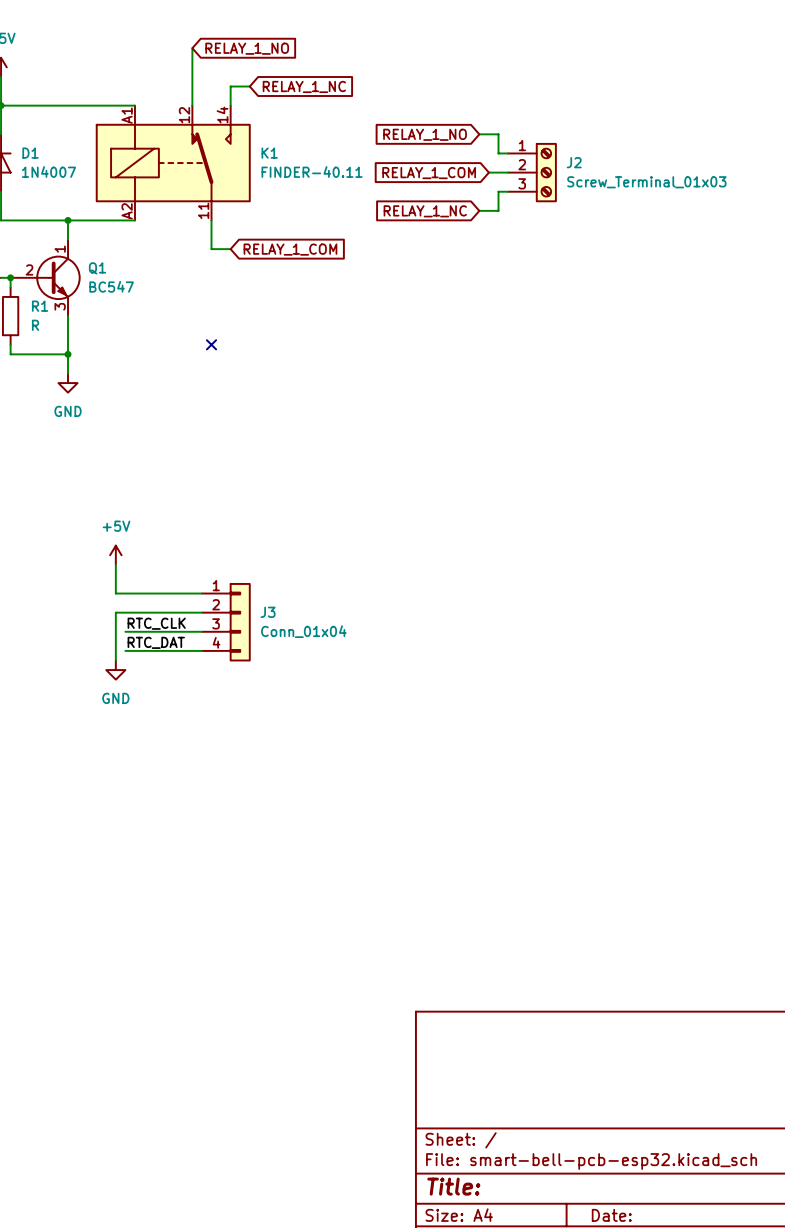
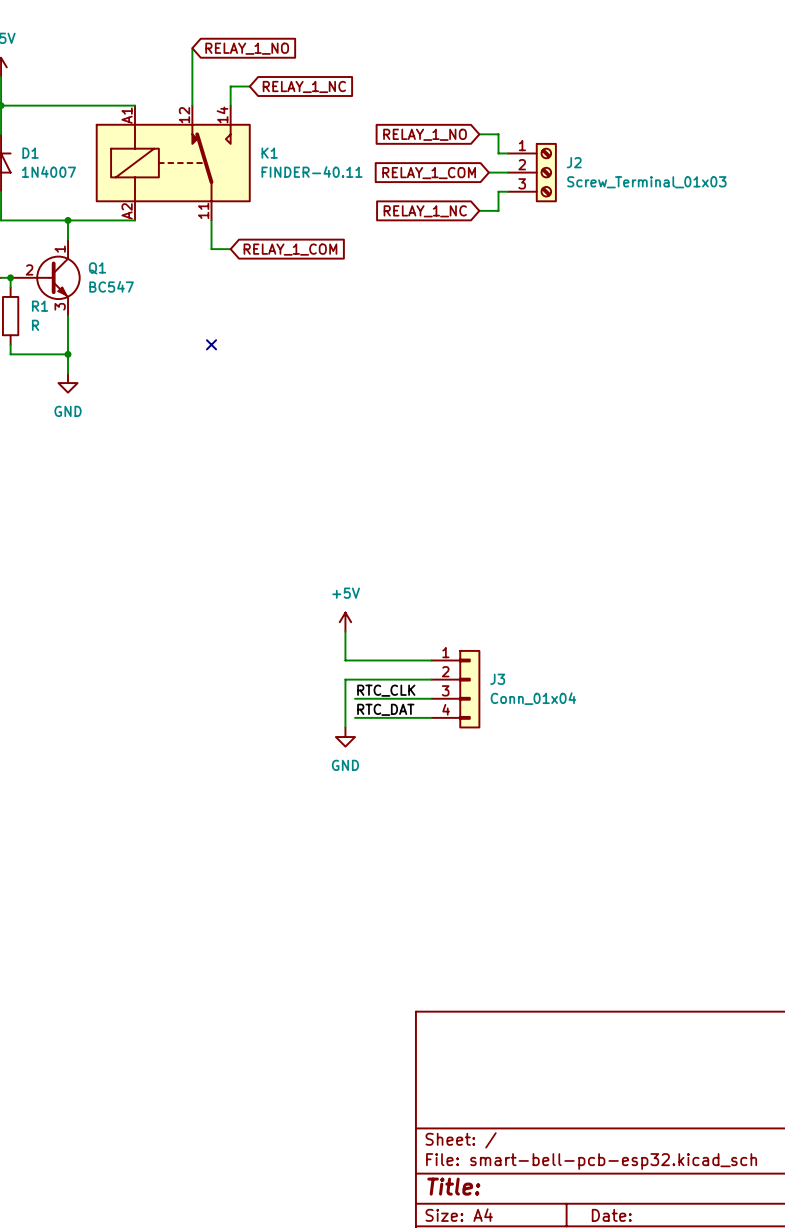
power symbol: +5V (115, 555) -> none
wire: (115, 564) (115, 593) (201, 593) -> none
wire: (201, 612) (115, 612) (115, 660) -> none
J3 position: (226, 622) -> (455, 689)
power symbol: none -> +5V (345, 622)
label: RTC_CLK (156, 623) -> none
wire: (125, 631) (201, 631) -> none
wire: none -> (345, 631) (345, 660) (431, 660)
label: RTC_DAT (156, 642) -> none
wire: (125, 650) (201, 650) -> none
power symbol: GND (115, 670) -> none
wire: none -> (431, 679) (345, 679) (345, 727)
label: none -> RTC_CLK (386, 690)
wire: none -> (355, 698) (431, 698)
label: none -> RTC_DAT (385, 709)
wire: none -> (355, 717) (431, 717)
power symbol: none -> GND (345, 737)

